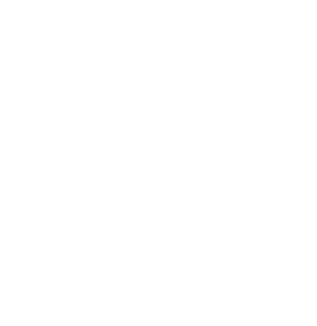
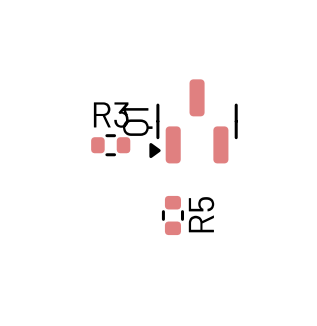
Q1: none -> (193, 121)
R3: none -> (110, 145)
R5: none -> (172, 215)

